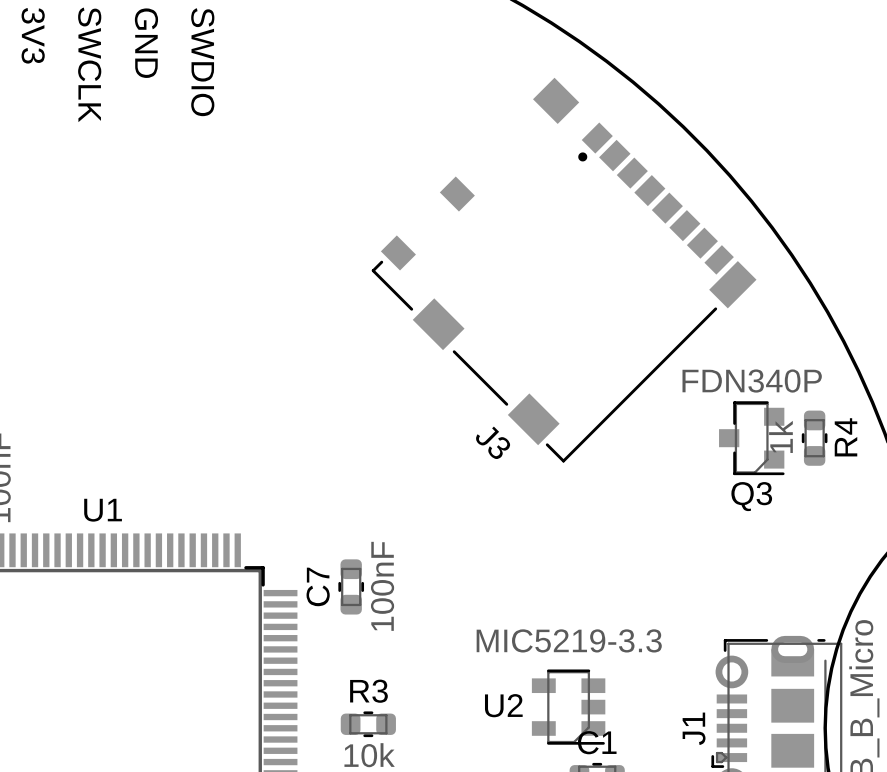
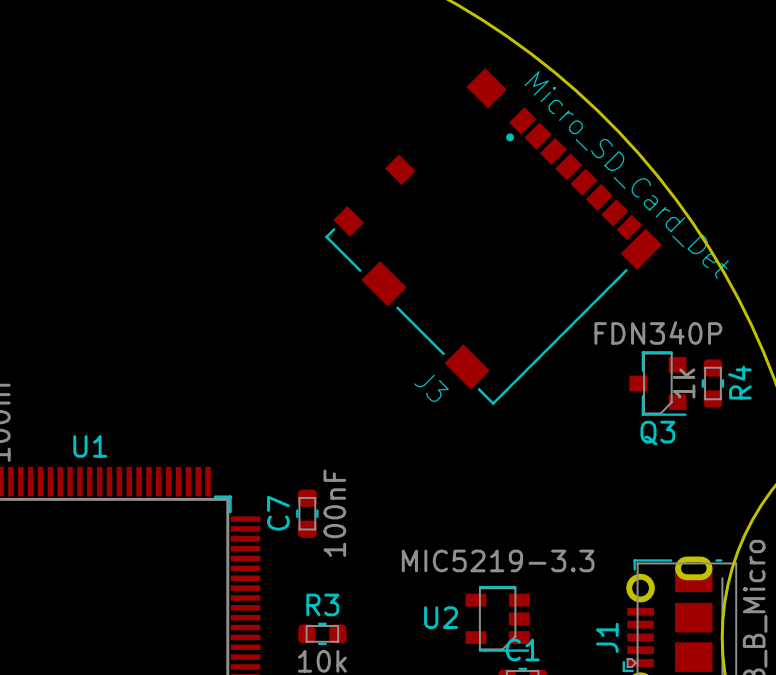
text: 3V3 (33, 35) -> none
text: GND (146, 43) -> none
text: SWDIO (202, 62) -> none
text: SWCLK (89, 64) -> none
J3 value: none -> Micro_SD_Card_Det (626, 174)

